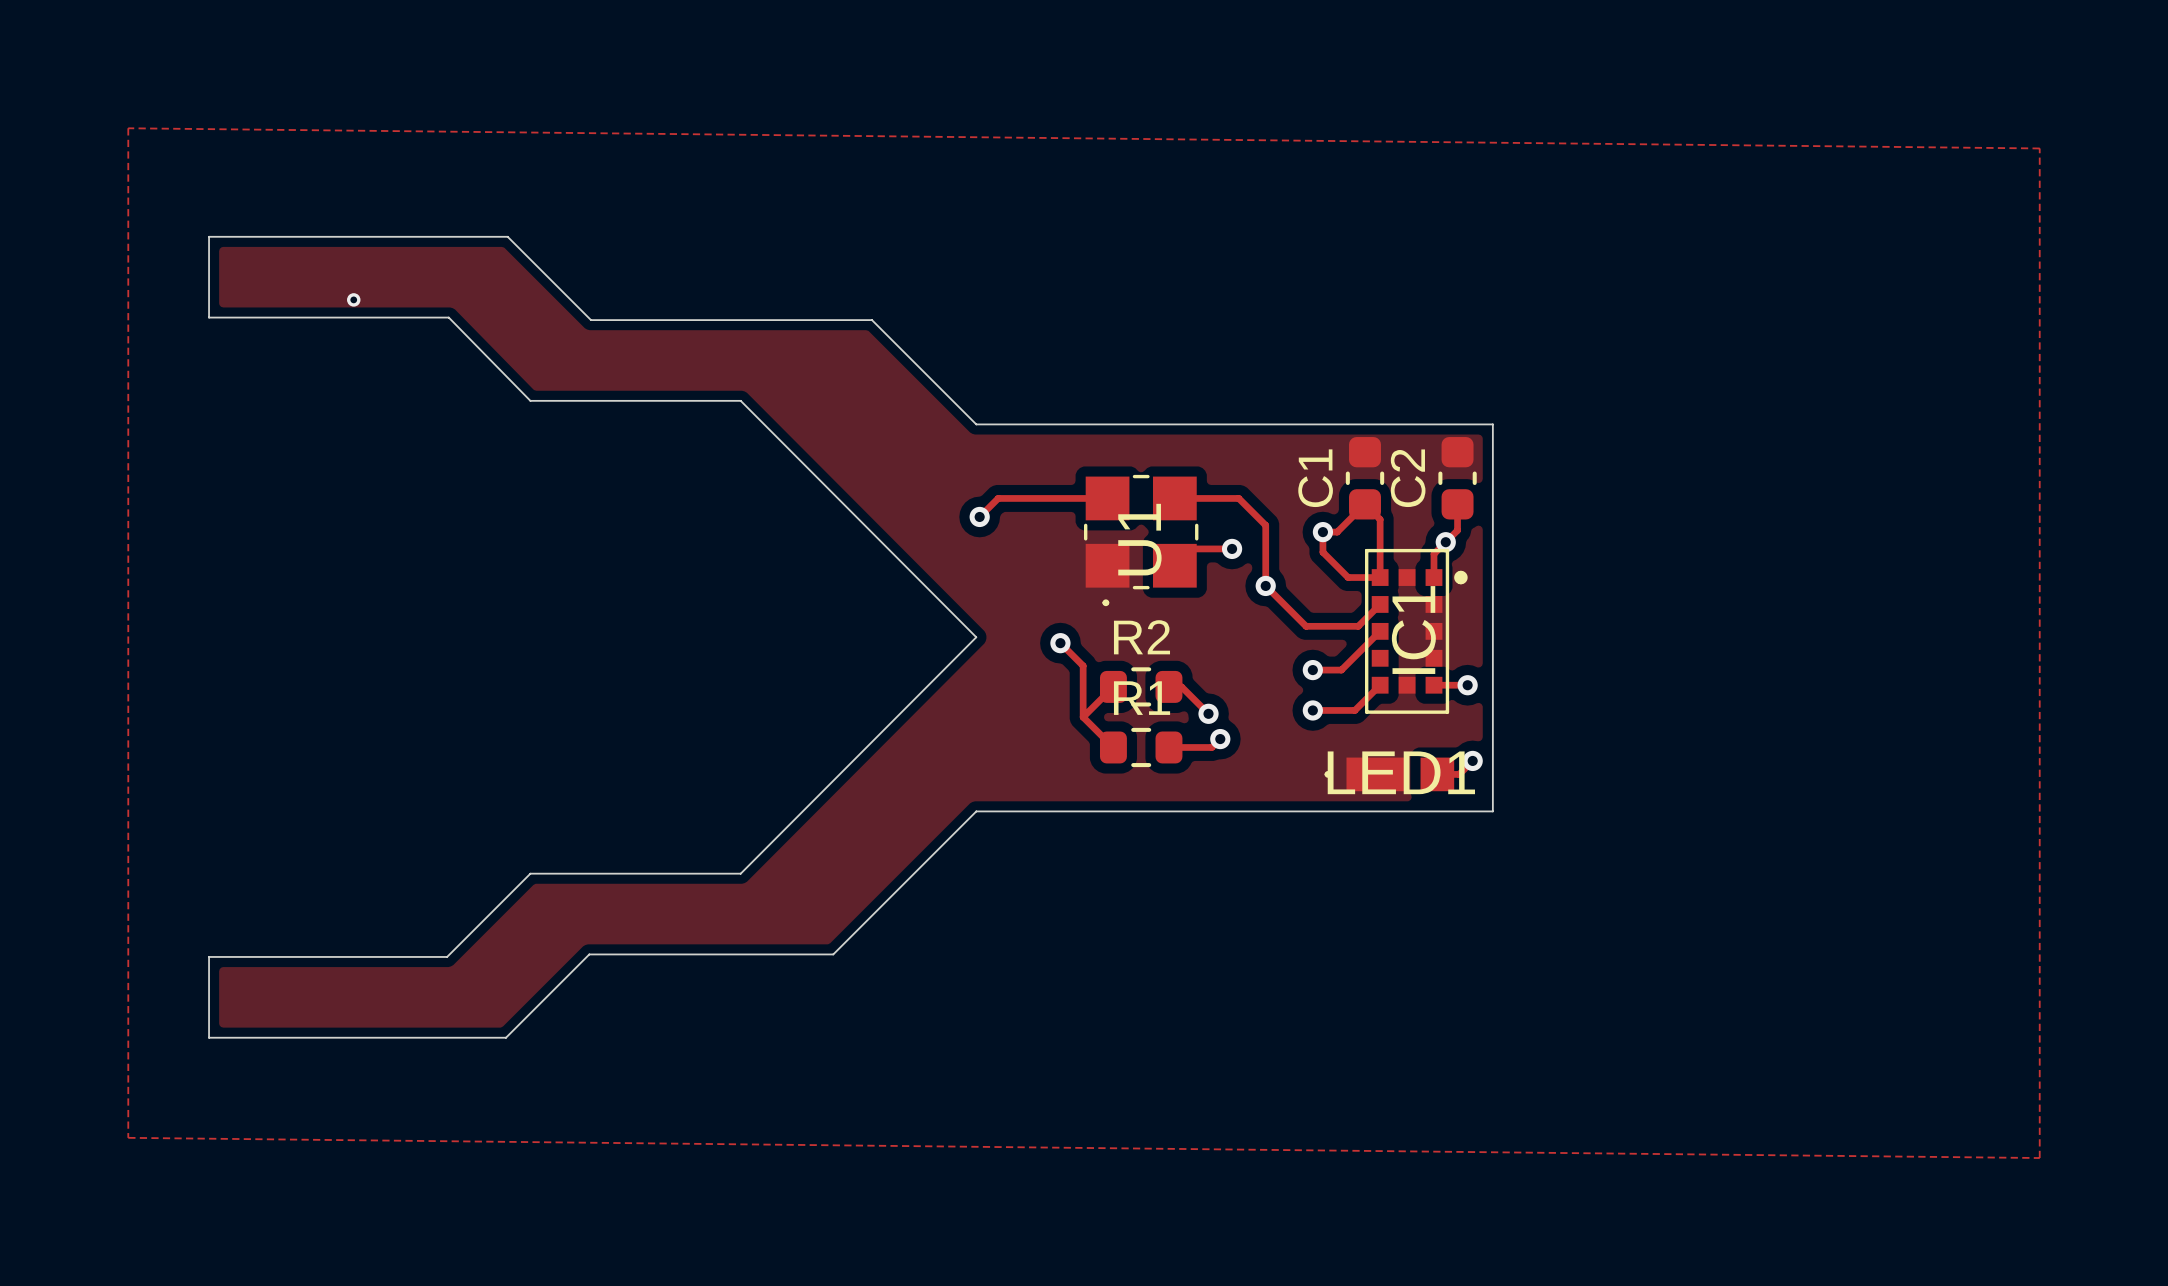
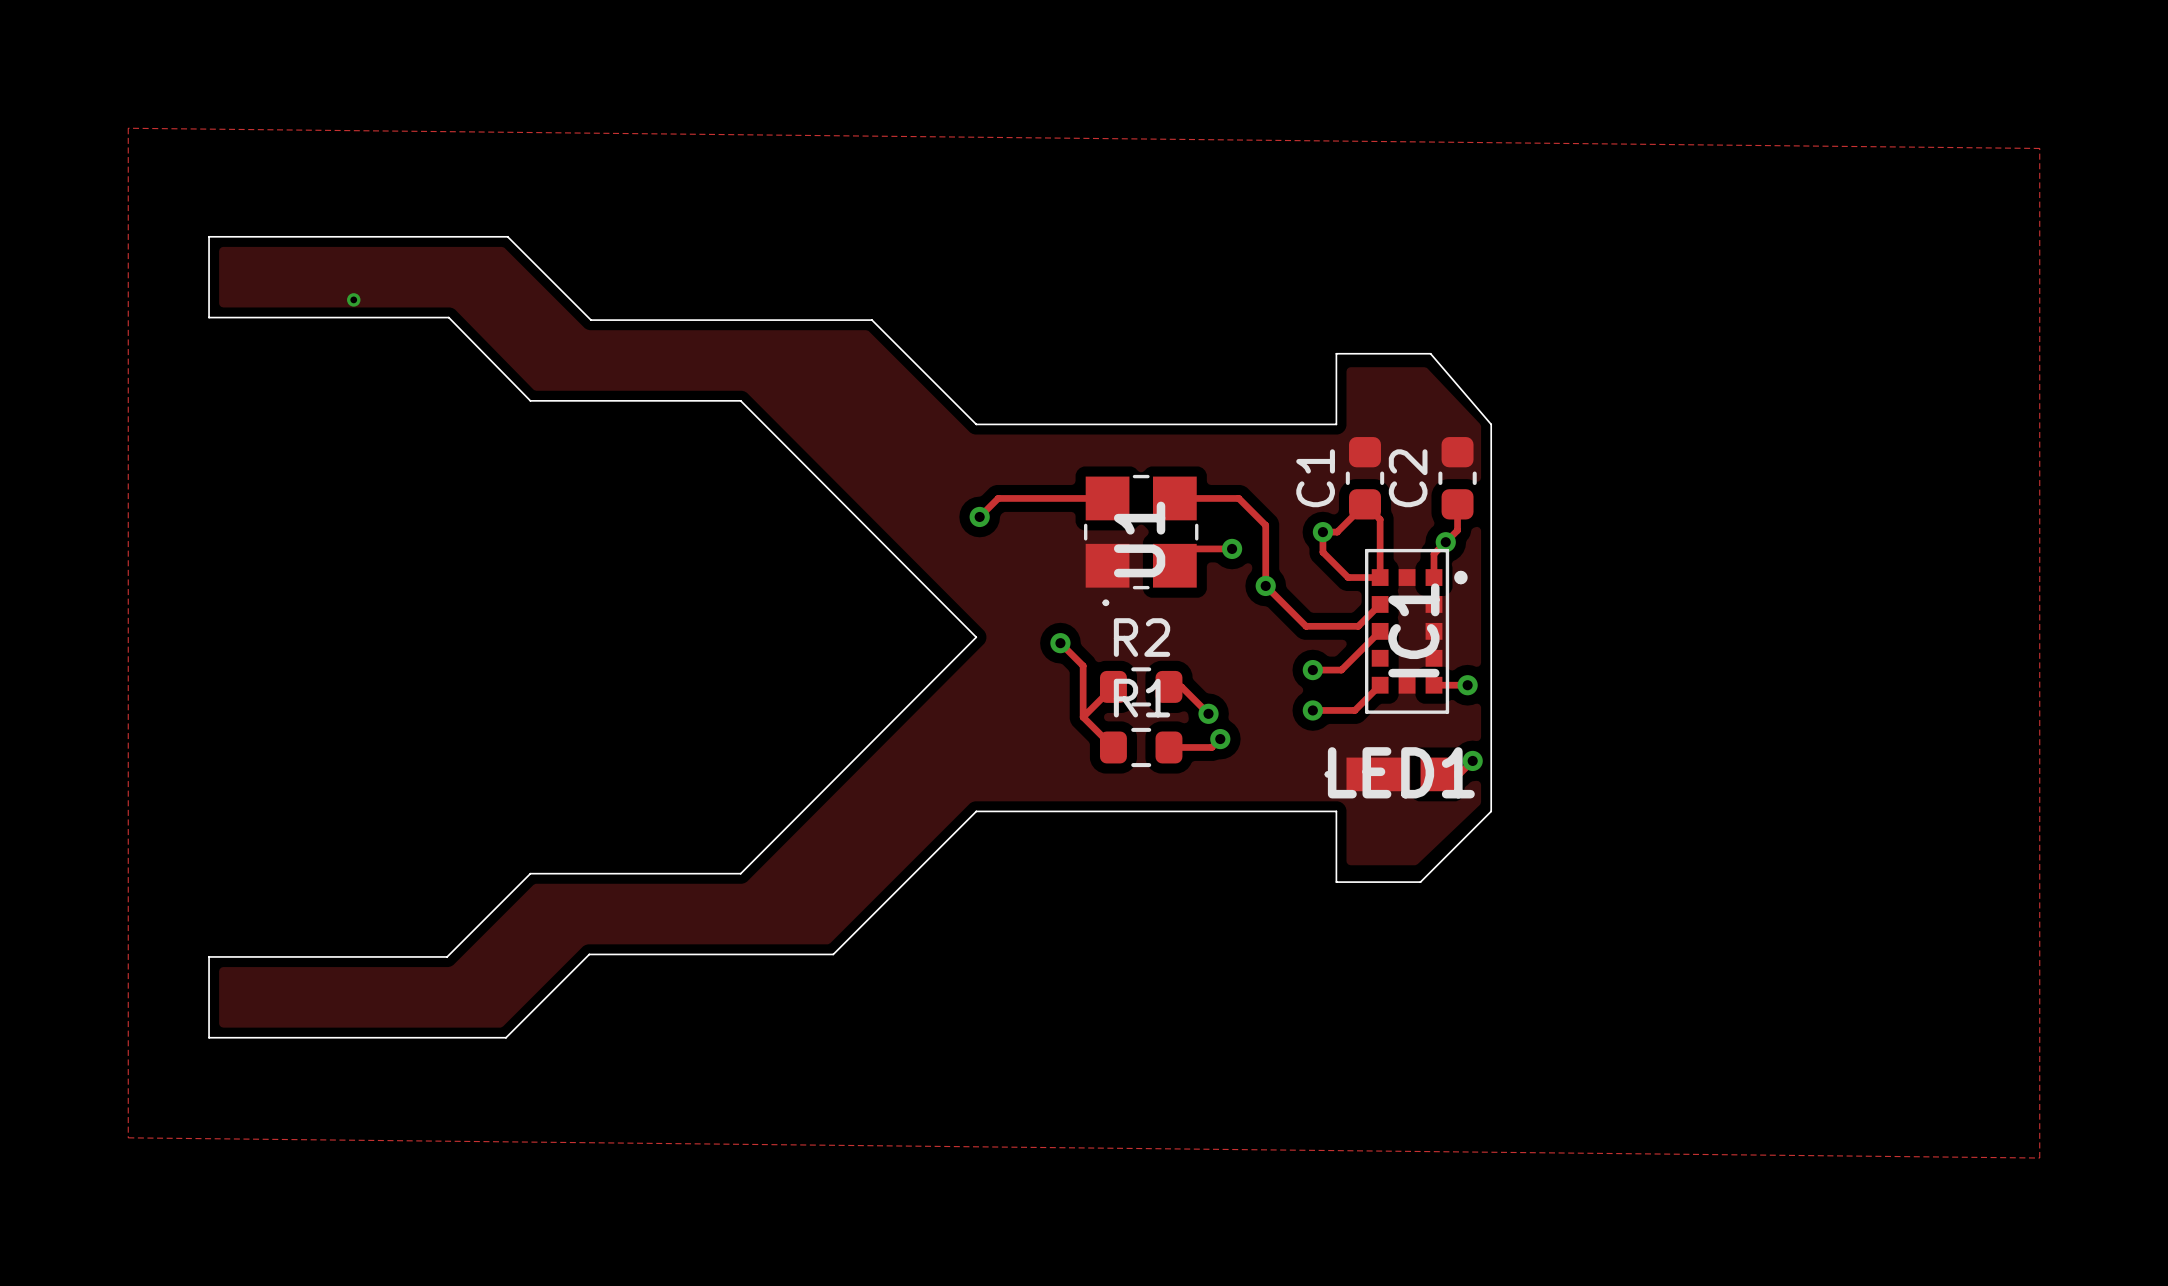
board edge: (1336, 424) (1492, 424) (1492, 811) (1336, 811) -> (1336, 424) (1336, 353) (1430, 353) (1491, 424) (1491, 811) (1420, 882) (1336, 882) (1336, 811)

